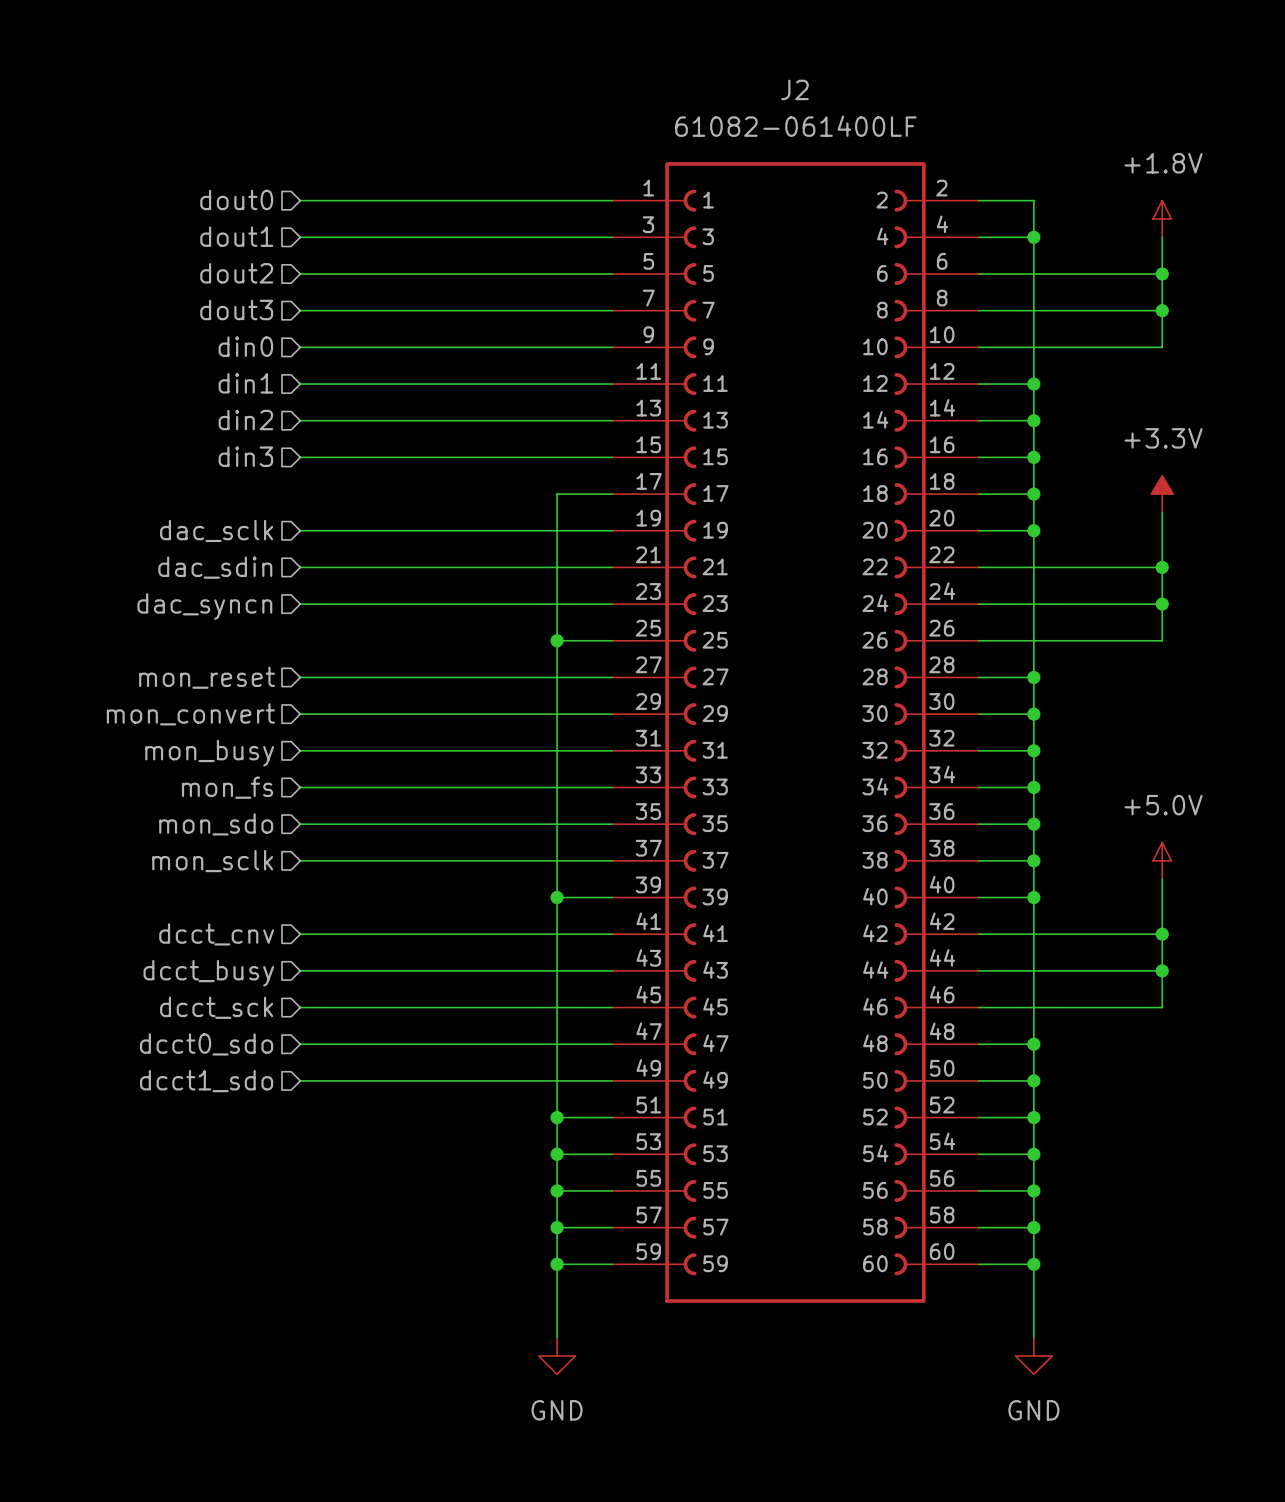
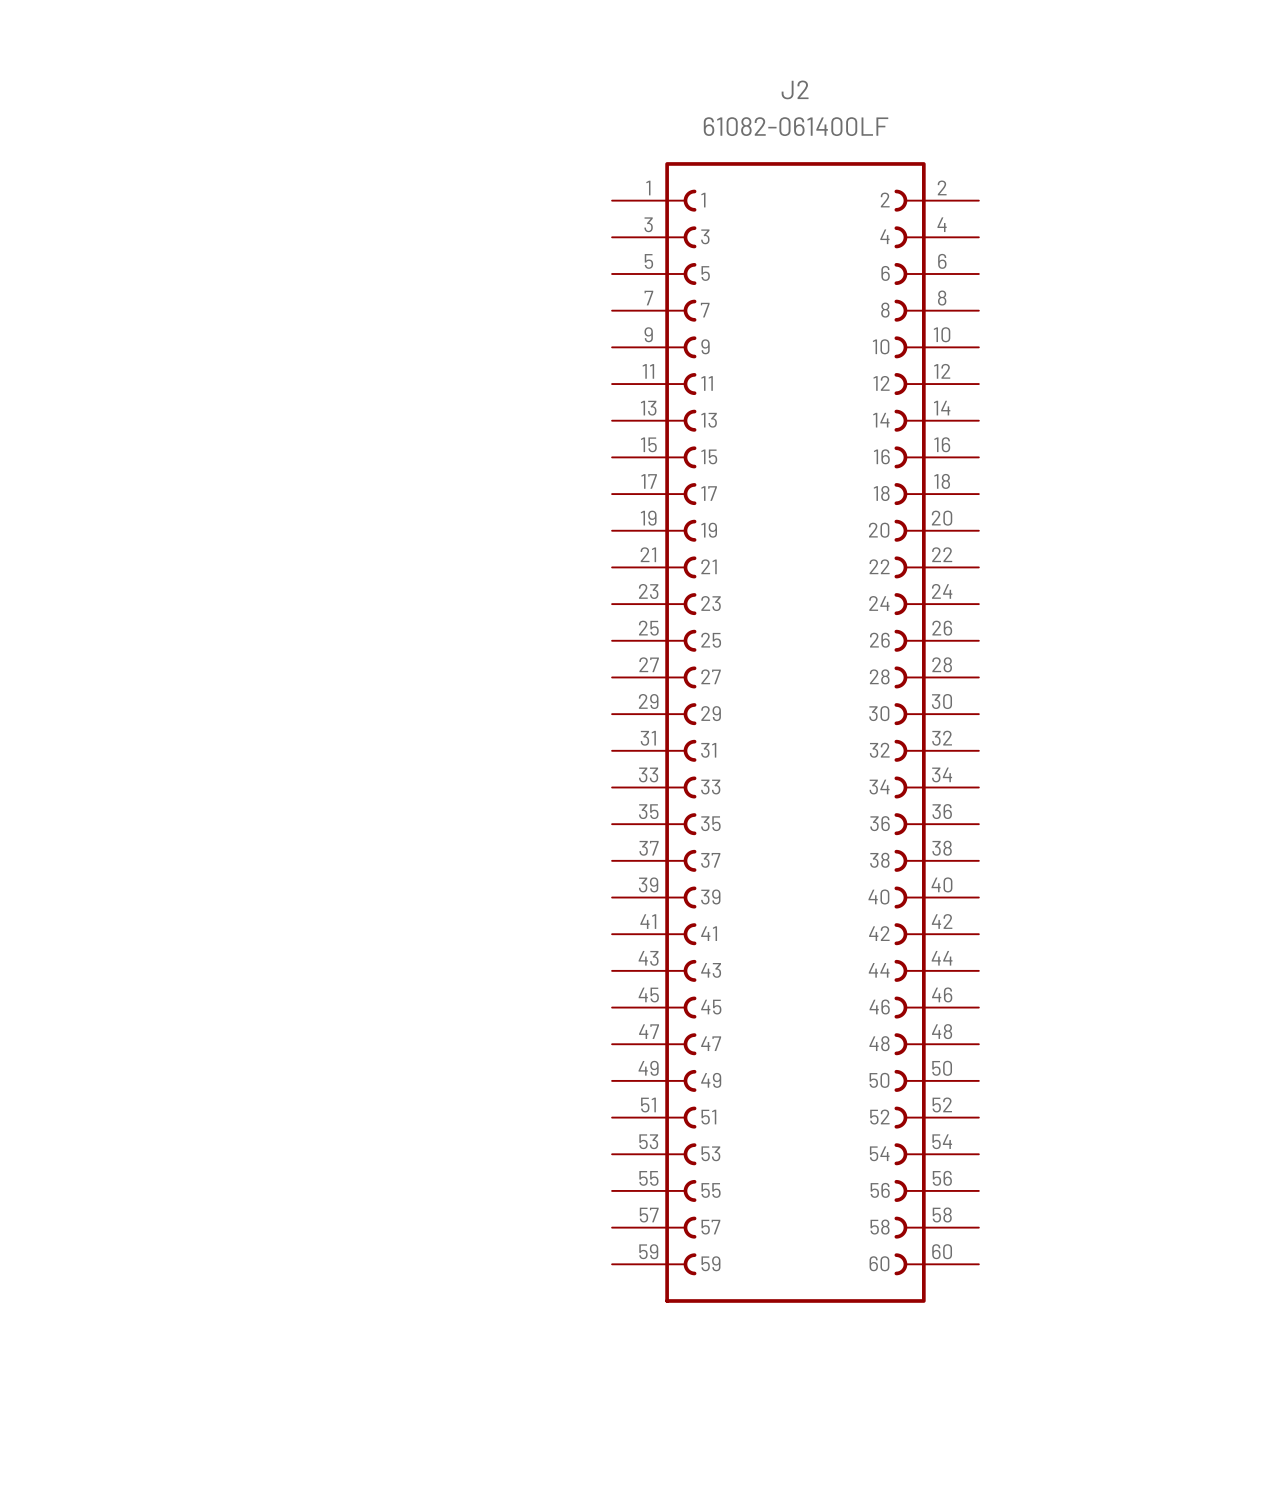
hierarchical label: dout0 (236, 199) -> none
wire: (300, 200) (612, 200) -> none
wire: (978, 200) (1033, 200) (1033, 1337) -> none
power symbol: +1.8V (1162, 218) -> none
hierarchical label: dout1 (236, 236) -> none
wire: (300, 237) (612, 237) -> none
wire: (978, 237) (1033, 237) -> none
junction: (1033, 237) -> none
wire: (1162, 237) (1162, 347) (978, 347) -> none
hierarchical label: dout2 (236, 273) -> none
wire: (300, 274) (612, 274) -> none
wire: (978, 274) (1162, 274) -> none
junction: (1162, 274) -> none
hierarchical label: dout3 (236, 309) -> none
wire: (300, 310) (612, 310) -> none
wire: (978, 310) (1162, 310) -> none
junction: (1162, 310) -> none
hierarchical label: din0 (245, 346) -> none
wire: (300, 347) (612, 347) -> none
hierarchical label: din1 (245, 383) -> none
wire: (300, 384) (612, 384) -> none
wire: (978, 384) (1033, 384) -> none
junction: (1033, 384) -> none
hierarchical label: din2 (245, 420) -> none
wire: (300, 420) (612, 420) -> none
wire: (978, 420) (1033, 420) -> none
junction: (1033, 420) -> none
hierarchical label: din3 (245, 456) -> none
wire: (300, 457) (612, 457) -> none
wire: (978, 457) (1033, 457) -> none
junction: (1033, 457) -> none
wire: (612, 494) (557, 494) (557, 1337) -> none
wire: (978, 494) (1033, 494) -> none
junction: (1033, 494) -> none
power symbol: +3.3V (1162, 494) -> none
wire: (1162, 512) (1162, 640) (978, 640) -> none
hierarchical label: dac_sclk (216, 530) -> none
wire: (300, 530) (612, 530) -> none
wire: (978, 530) (1033, 530) -> none
junction: (1033, 530) -> none
hierarchical label: dac_sdin (215, 567) -> none
wire: (300, 567) (612, 567) -> none
wire: (978, 567) (1162, 567) -> none
junction: (1162, 567) -> none
wire: (300, 604) (612, 604) -> none
wire: (978, 604) (1162, 604) -> none
junction: (1162, 604) -> none
hierarchical label: dac_syncn (204, 606) -> none
wire: (557, 640) (612, 640) -> none
junction: (557, 640) -> none
hierarchical label: mon_reset (207, 677) -> none
wire: (300, 677) (612, 677) -> none
wire: (978, 677) (1033, 677) -> none
junction: (1033, 677) -> none
hierarchical label: mon_convert (190, 714) -> none
wire: (300, 714) (612, 714) -> none
wire: (978, 714) (1033, 714) -> none
junction: (1033, 714) -> none
wire: (300, 750) (612, 750) -> none
wire: (978, 750) (1033, 750) -> none
junction: (1033, 750) -> none
hierarchical label: mon_busy (209, 753) -> none
hierarchical label: mon_fs (227, 787) -> none
wire: (300, 787) (612, 787) -> none
wire: (978, 787) (1033, 787) -> none
junction: (1033, 787) -> none
hierarchical label: mon_sdo (216, 824) -> none
wire: (300, 824) (612, 824) -> none
wire: (978, 824) (1033, 824) -> none
junction: (1033, 824) -> none
wire: (300, 860) (612, 860) -> none
wire: (978, 860) (1033, 860) -> none
junction: (1033, 860) -> none
power symbol: +5.0V (1162, 860) -> none
hierarchical label: mon_sclk (212, 861) -> none
wire: (1162, 879) (1162, 1007) (978, 1007) -> none
wire: (557, 897) (612, 897) -> none
junction: (557, 897) -> none
wire: (978, 897) (1033, 897) -> none
junction: (1033, 897) -> none
hierarchical label: dcct_cnv (216, 934) -> none
wire: (300, 934) (612, 934) -> none
wire: (978, 934) (1162, 934) -> none
junction: (1162, 934) -> none
wire: (300, 970) (612, 970) -> none
wire: (978, 970) (1162, 970) -> none
junction: (1162, 970) -> none
hierarchical label: dcct_busy (208, 973) -> none
hierarchical label: dcct_sck (216, 1007) -> none
wire: (300, 1007) (612, 1007) -> none
hierarchical label: dcct0_sdo (206, 1044) -> none
wire: (300, 1044) (612, 1044) -> none
wire: (978, 1044) (1033, 1044) -> none
junction: (1033, 1044) -> none
wire: (300, 1080) (612, 1080) -> none
wire: (978, 1080) (1033, 1080) -> none
junction: (1033, 1080) -> none
hierarchical label: dcct1_sdo (206, 1081) -> none
wire: (557, 1117) (612, 1117) -> none
junction: (557, 1117) -> none
wire: (978, 1117) (1033, 1117) -> none
junction: (1033, 1117) -> none
wire: (557, 1154) (612, 1154) -> none
junction: (557, 1154) -> none
wire: (978, 1154) (1033, 1154) -> none
junction: (1033, 1154) -> none
wire: (557, 1190) (612, 1190) -> none
junction: (557, 1190) -> none
wire: (978, 1190) (1033, 1190) -> none
junction: (1033, 1190) -> none
wire: (557, 1227) (612, 1227) -> none
junction: (557, 1227) -> none
wire: (978, 1227) (1033, 1227) -> none
junction: (1033, 1227) -> none
wire: (557, 1264) (612, 1264) -> none
junction: (557, 1264) -> none
wire: (978, 1264) (1033, 1264) -> none
junction: (1033, 1264) -> none
power symbol: GND (557, 1356) -> none
power symbol: GND (1033, 1356) -> none

